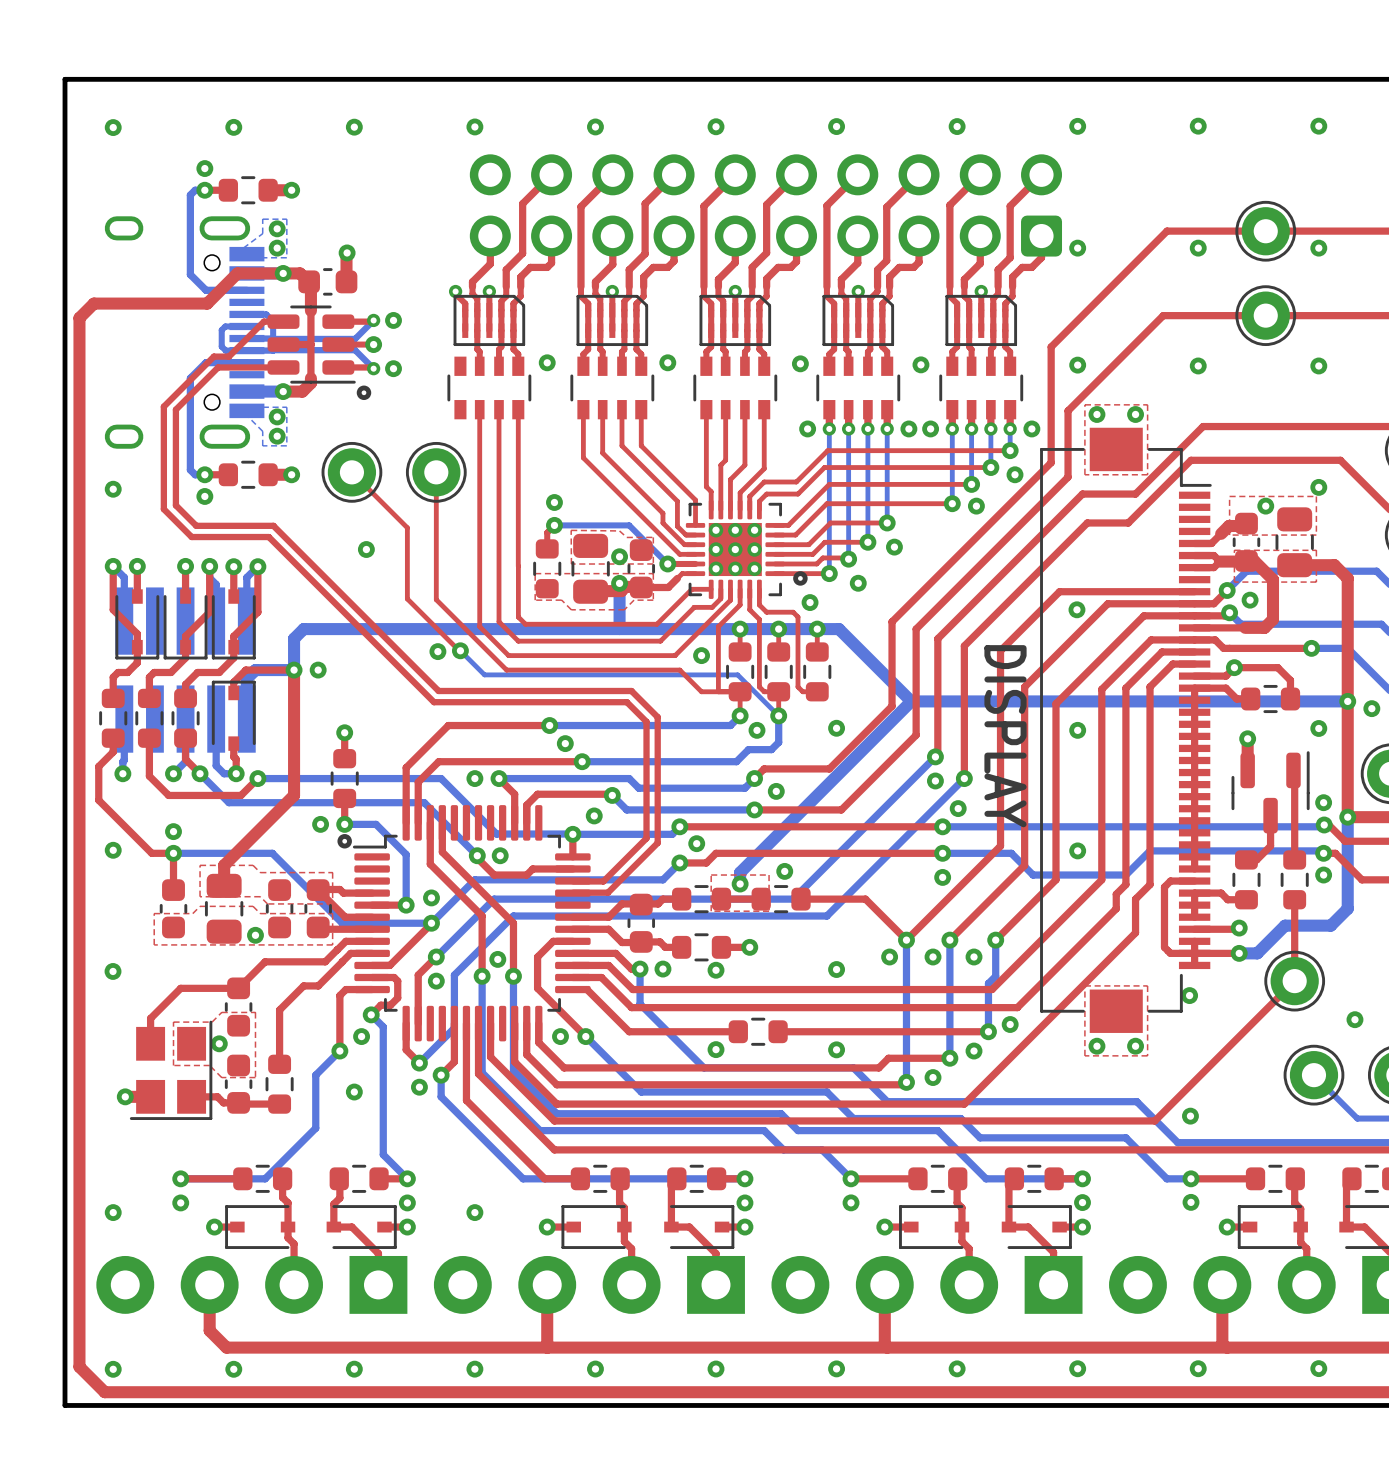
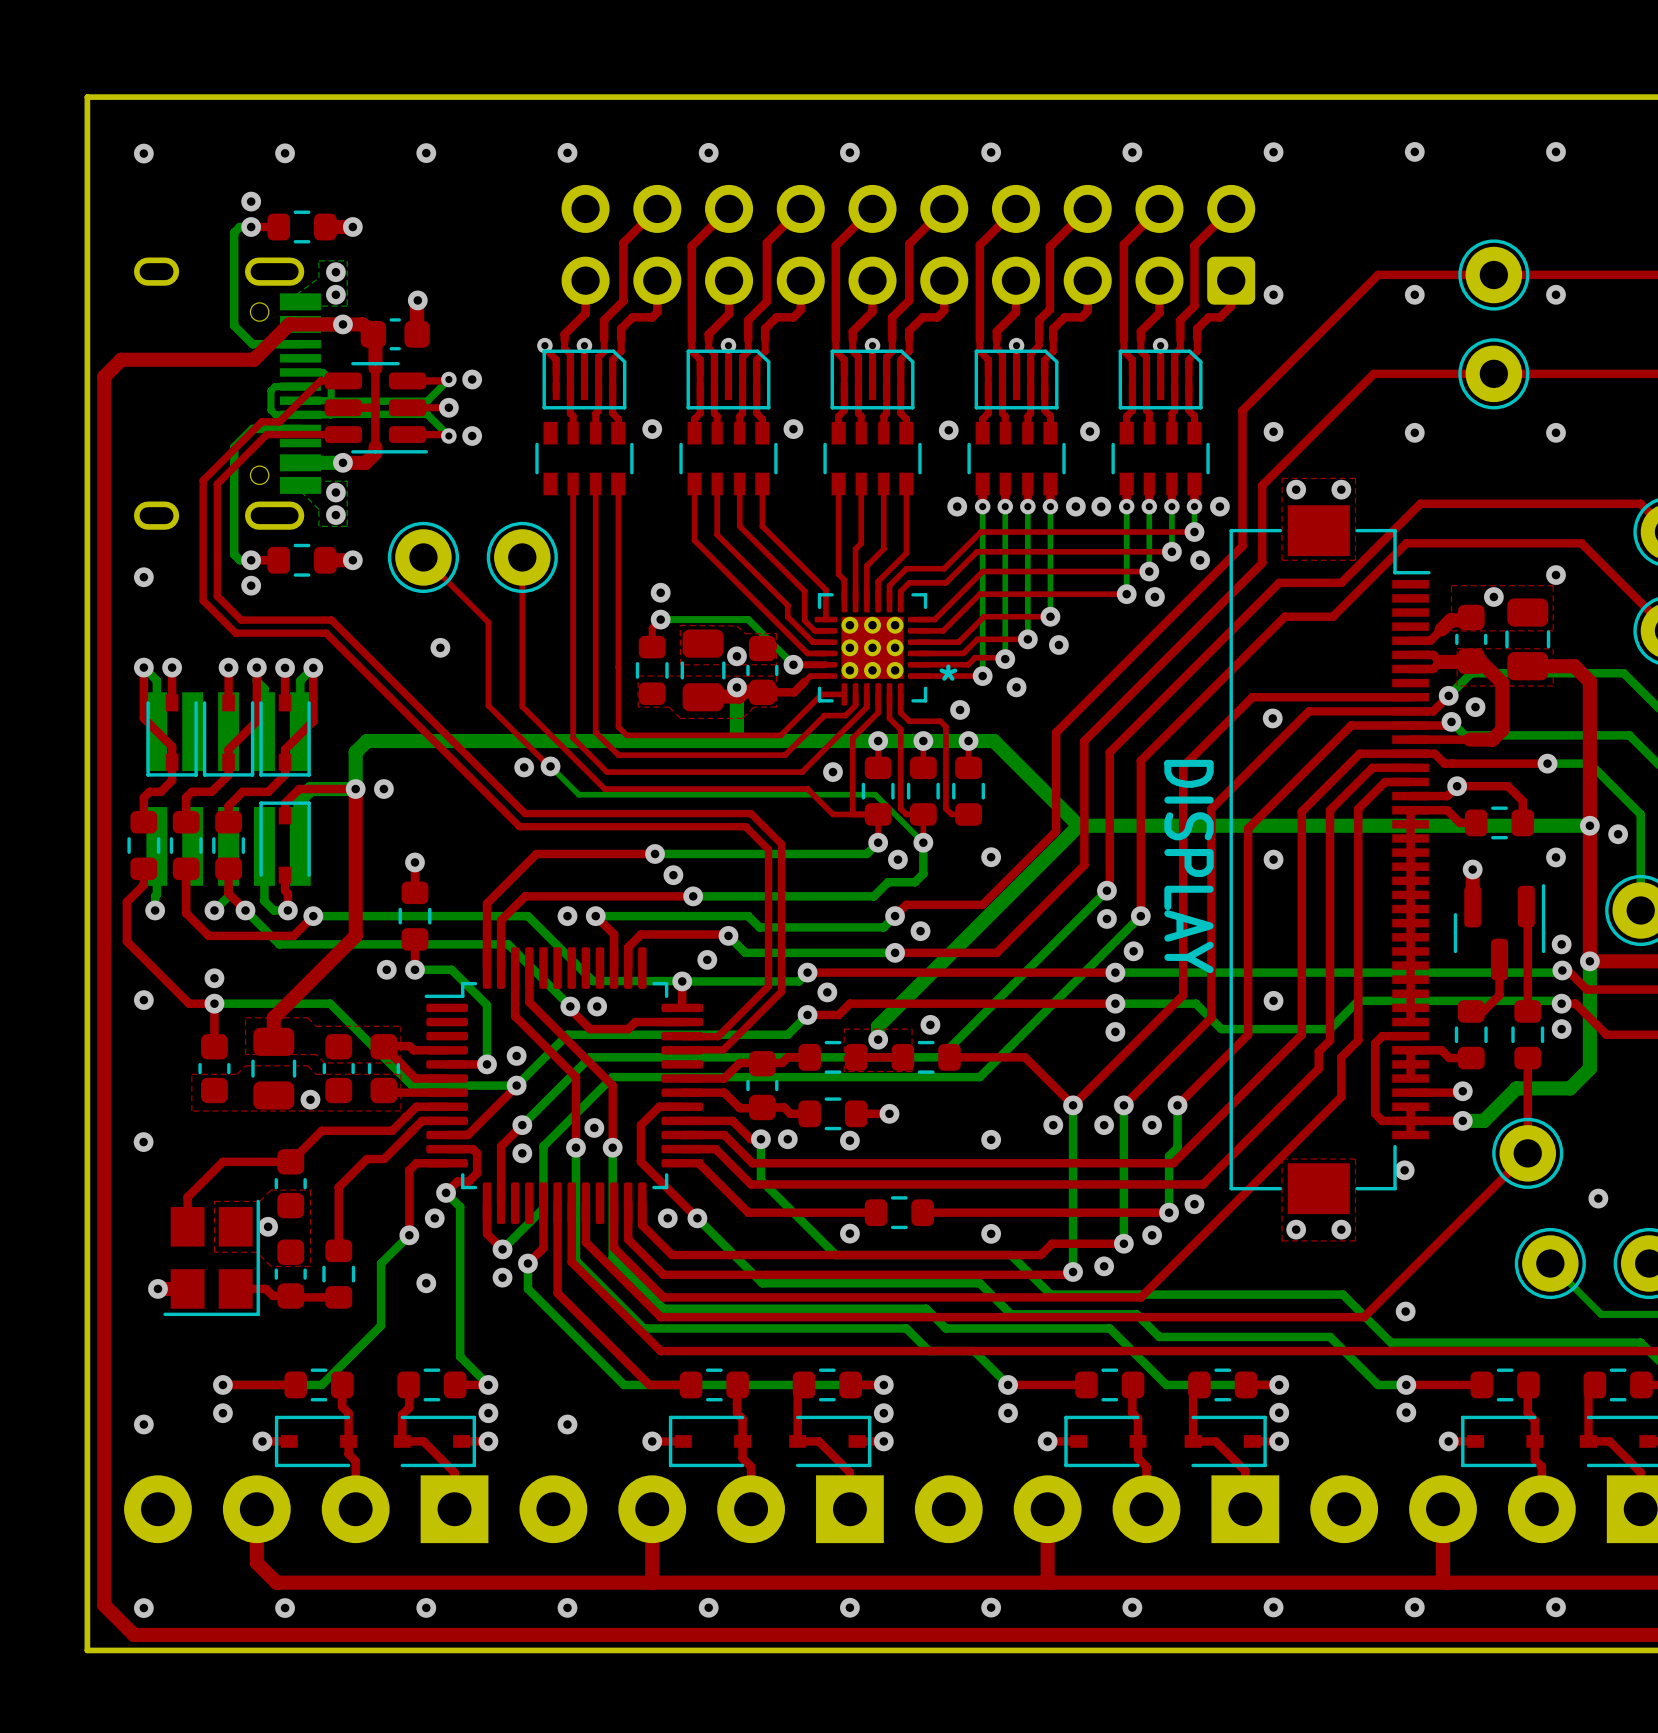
drawing: [356, 385, 372, 401] -> none
part text: none -> * (948, 672)
drawing: [793, 571, 808, 586] -> none
drawing: [337, 834, 352, 849] -> none

